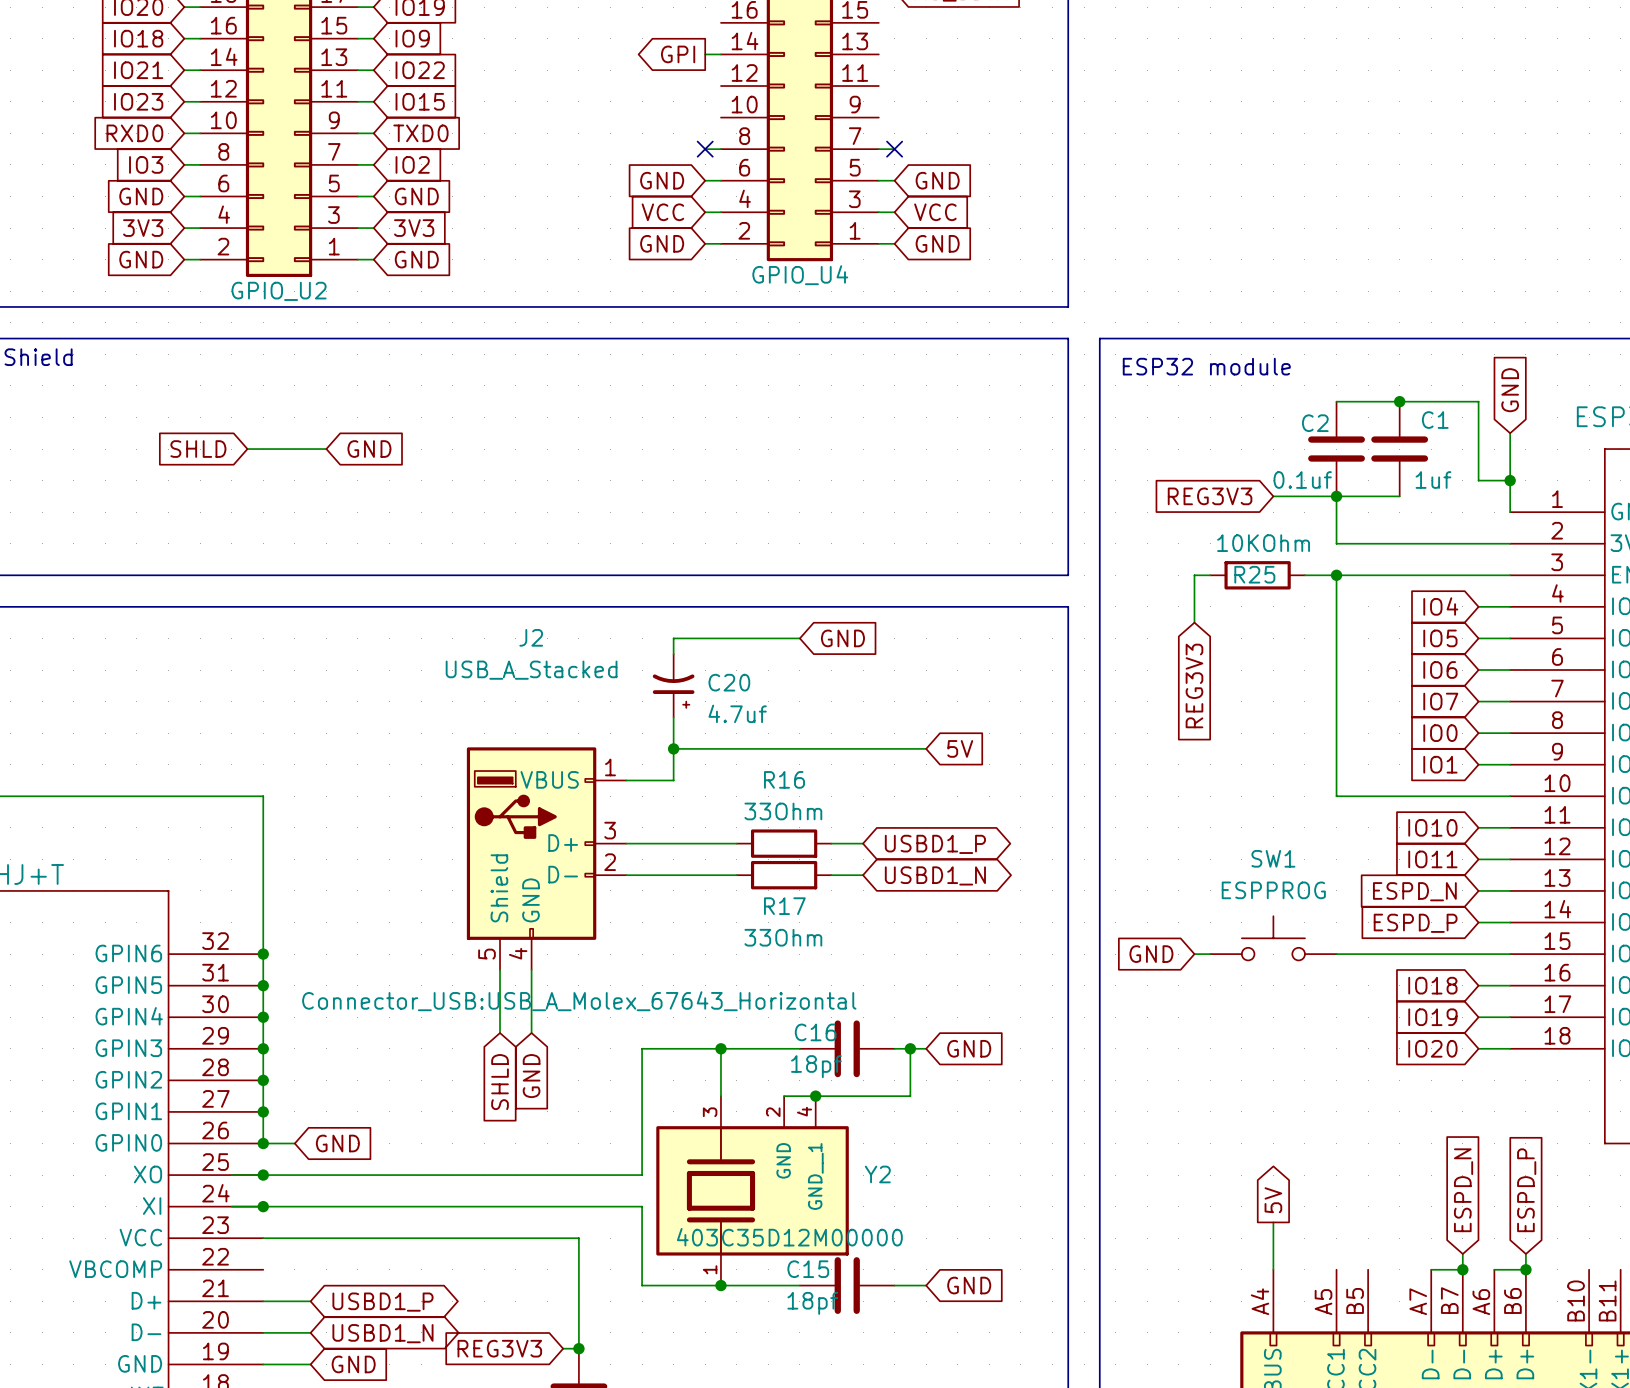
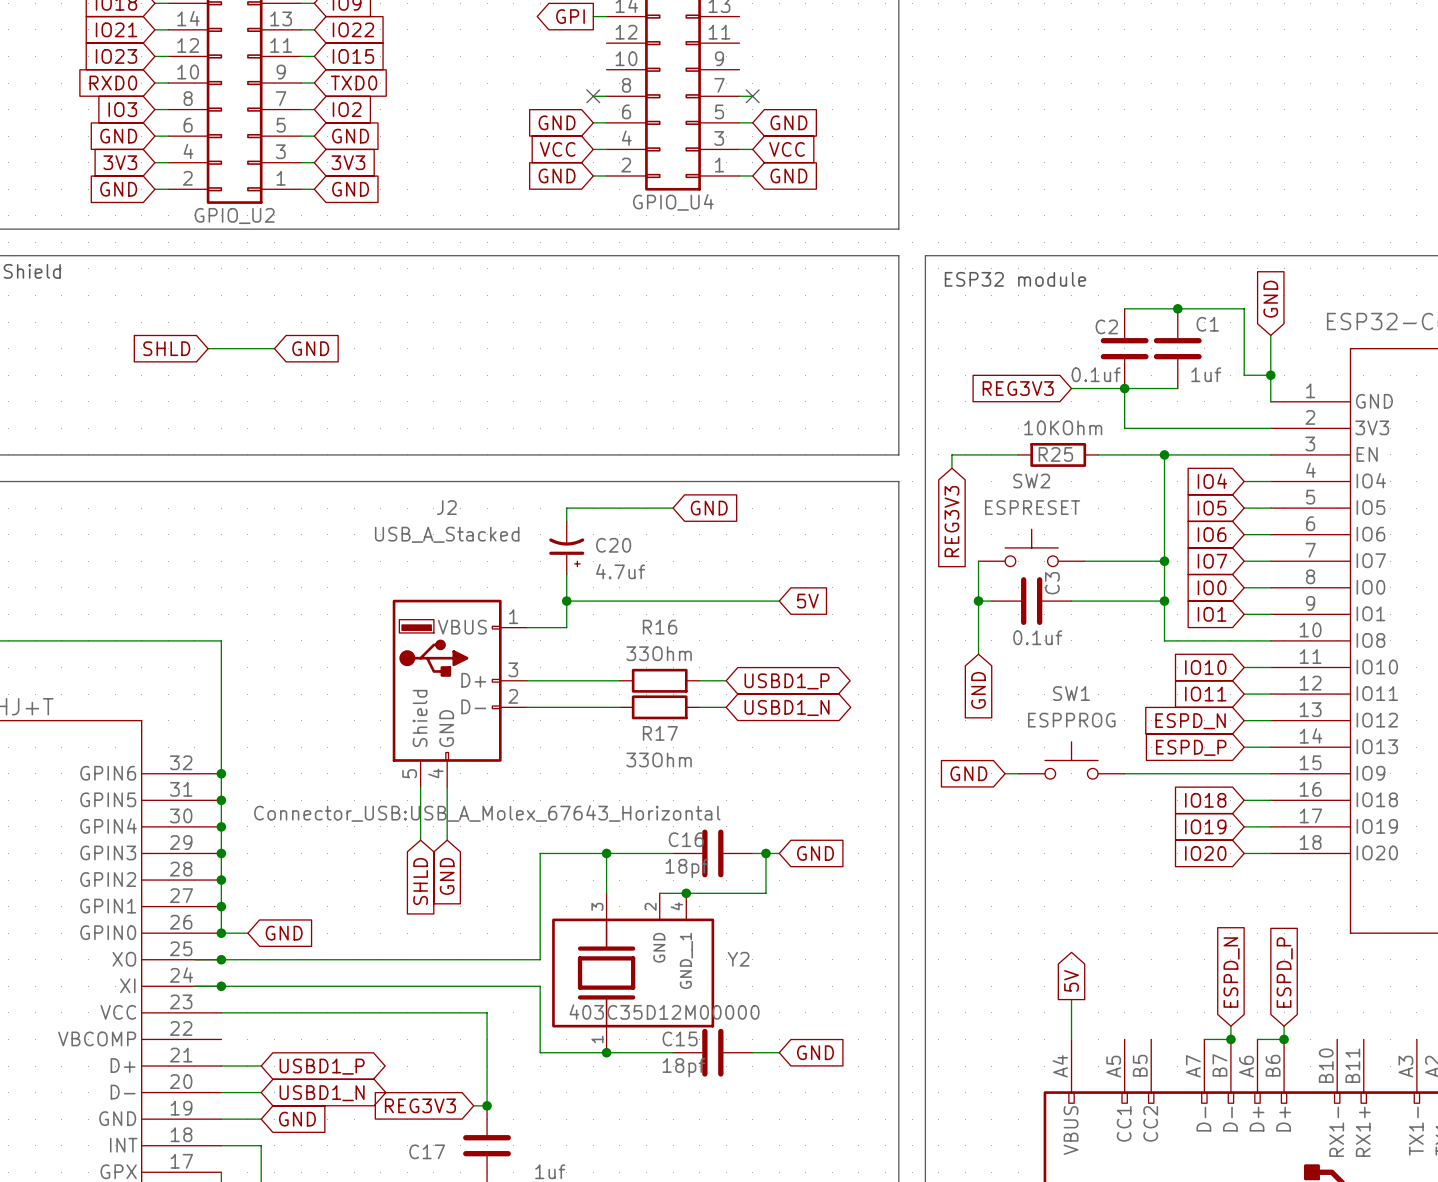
wire: (1194, 575) (1194, 622) -> (1005, 454) (951, 454) (951, 468)
wire: (1336, 575) (1336, 796) (1383, 796) -> (1164, 454) (1164, 640)
junction position: (1336, 575) -> (1164, 454)
global label position: REG3V3 (1194, 685) -> REG3V3 (951, 521)
SW2: none -> ESPRESET (1031, 547)
wire: none -> (978, 561) (978, 654)
wire: none -> (1084, 561) (1164, 561)
junction: none -> (1164, 561)
wire: none -> (978, 601) (991, 601)
junction: none -> (978, 601)
C3: none -> 0.1uf (1031, 601)
wire: none -> (1071, 601) (1164, 601)
junction: none -> (1164, 601)
global label: none -> GND (978, 690)

